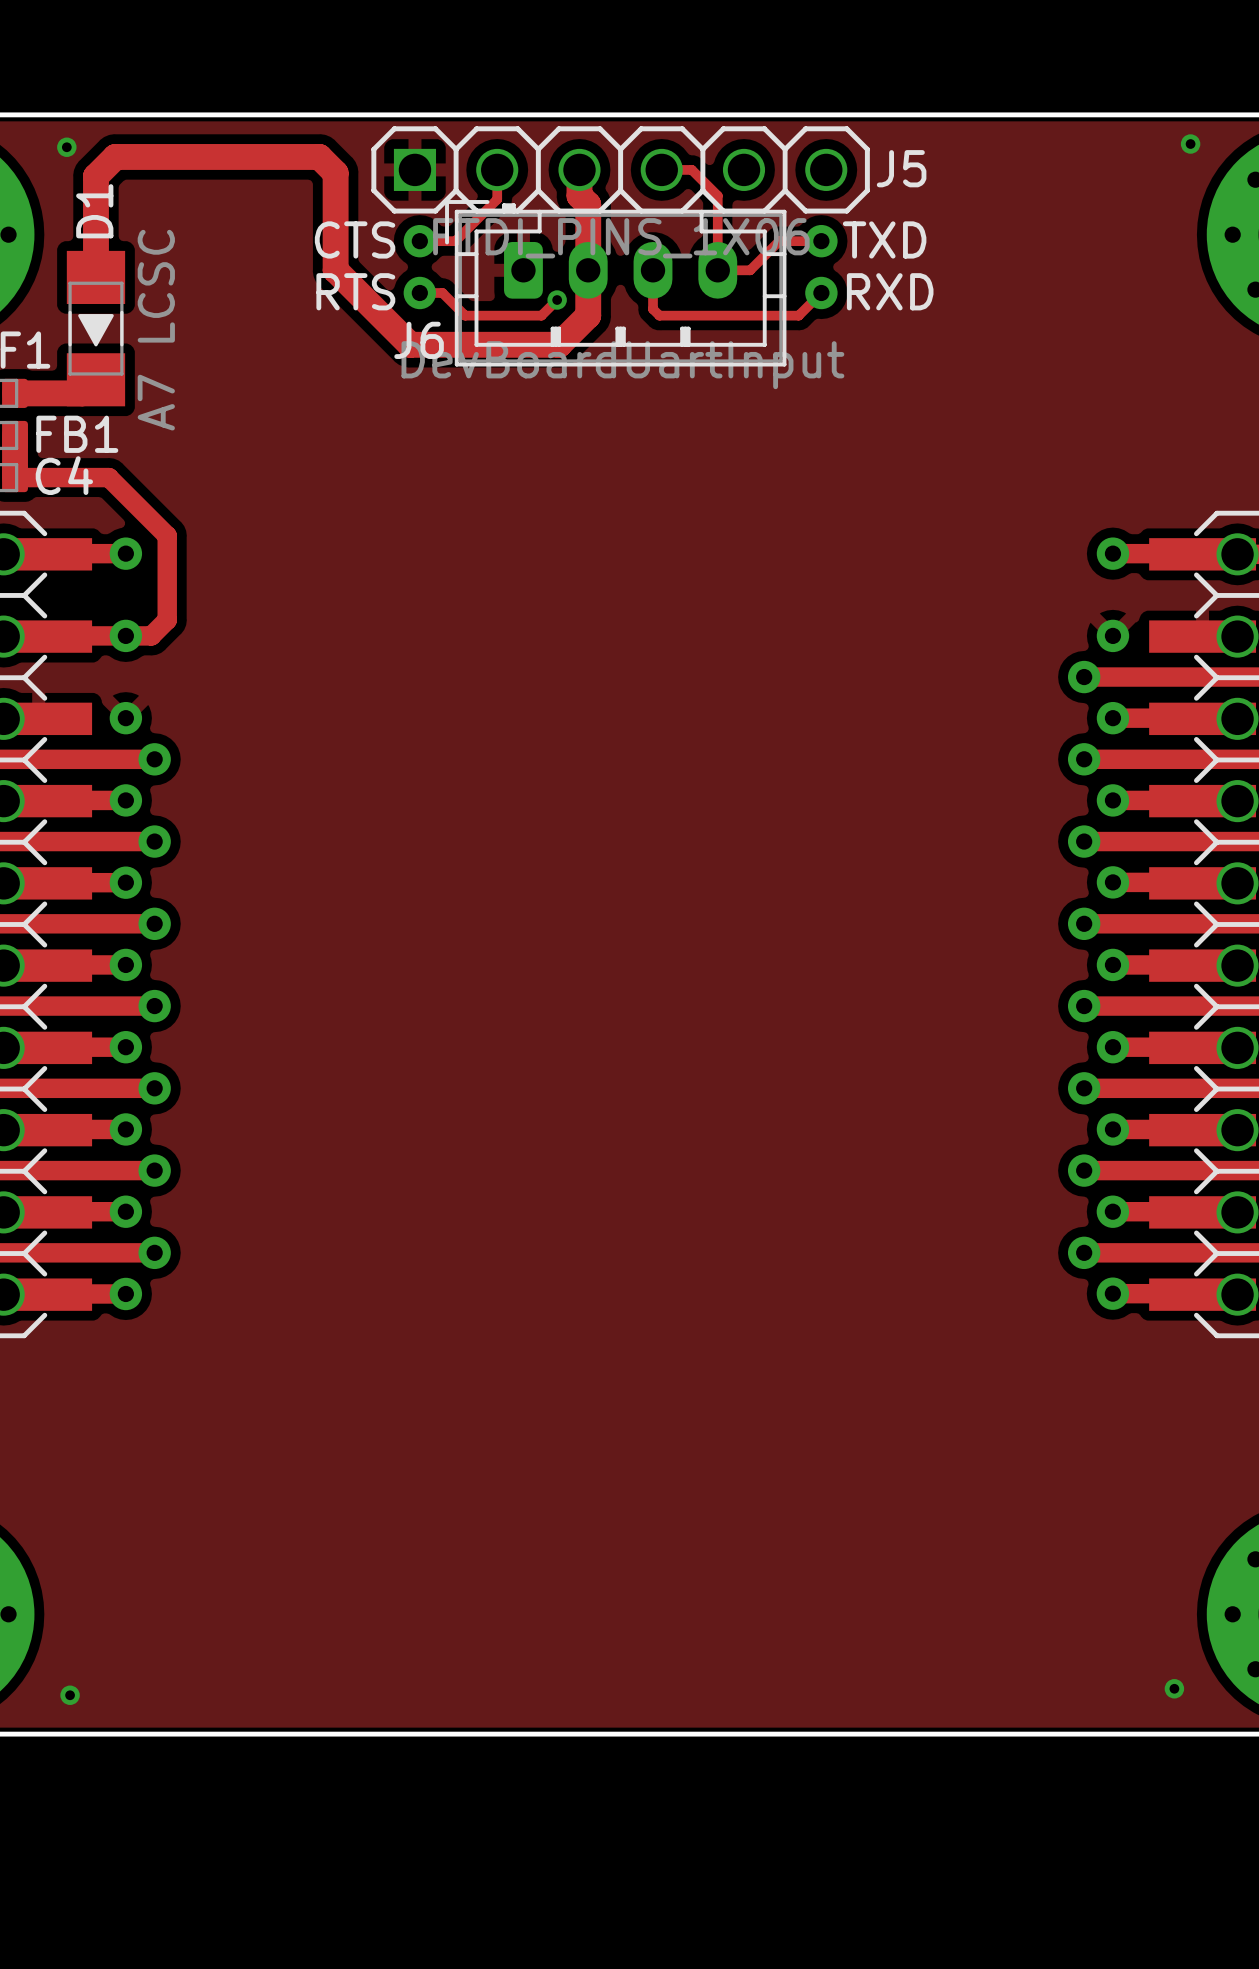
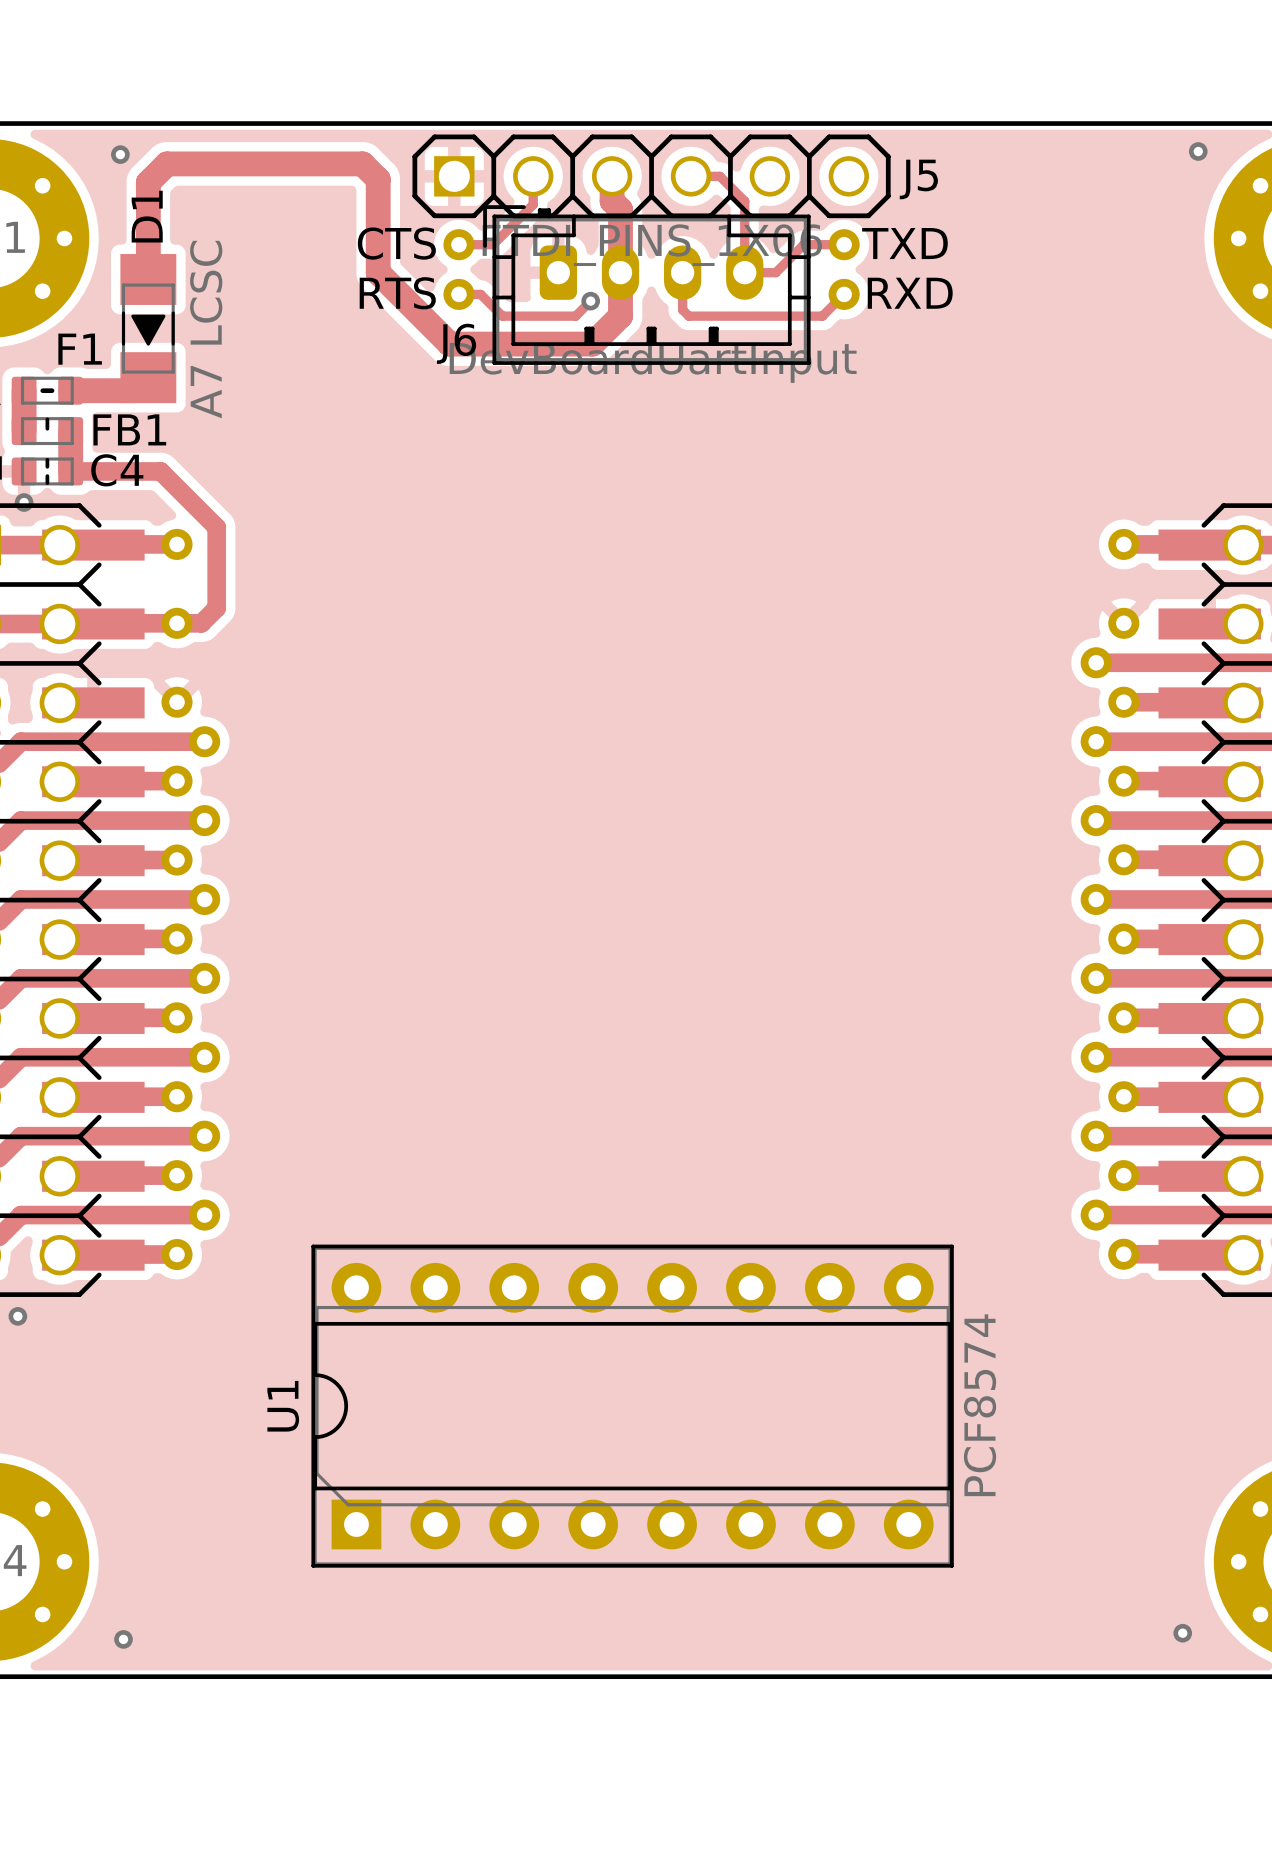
U1: none -> PCF8574 (632, 1406)

